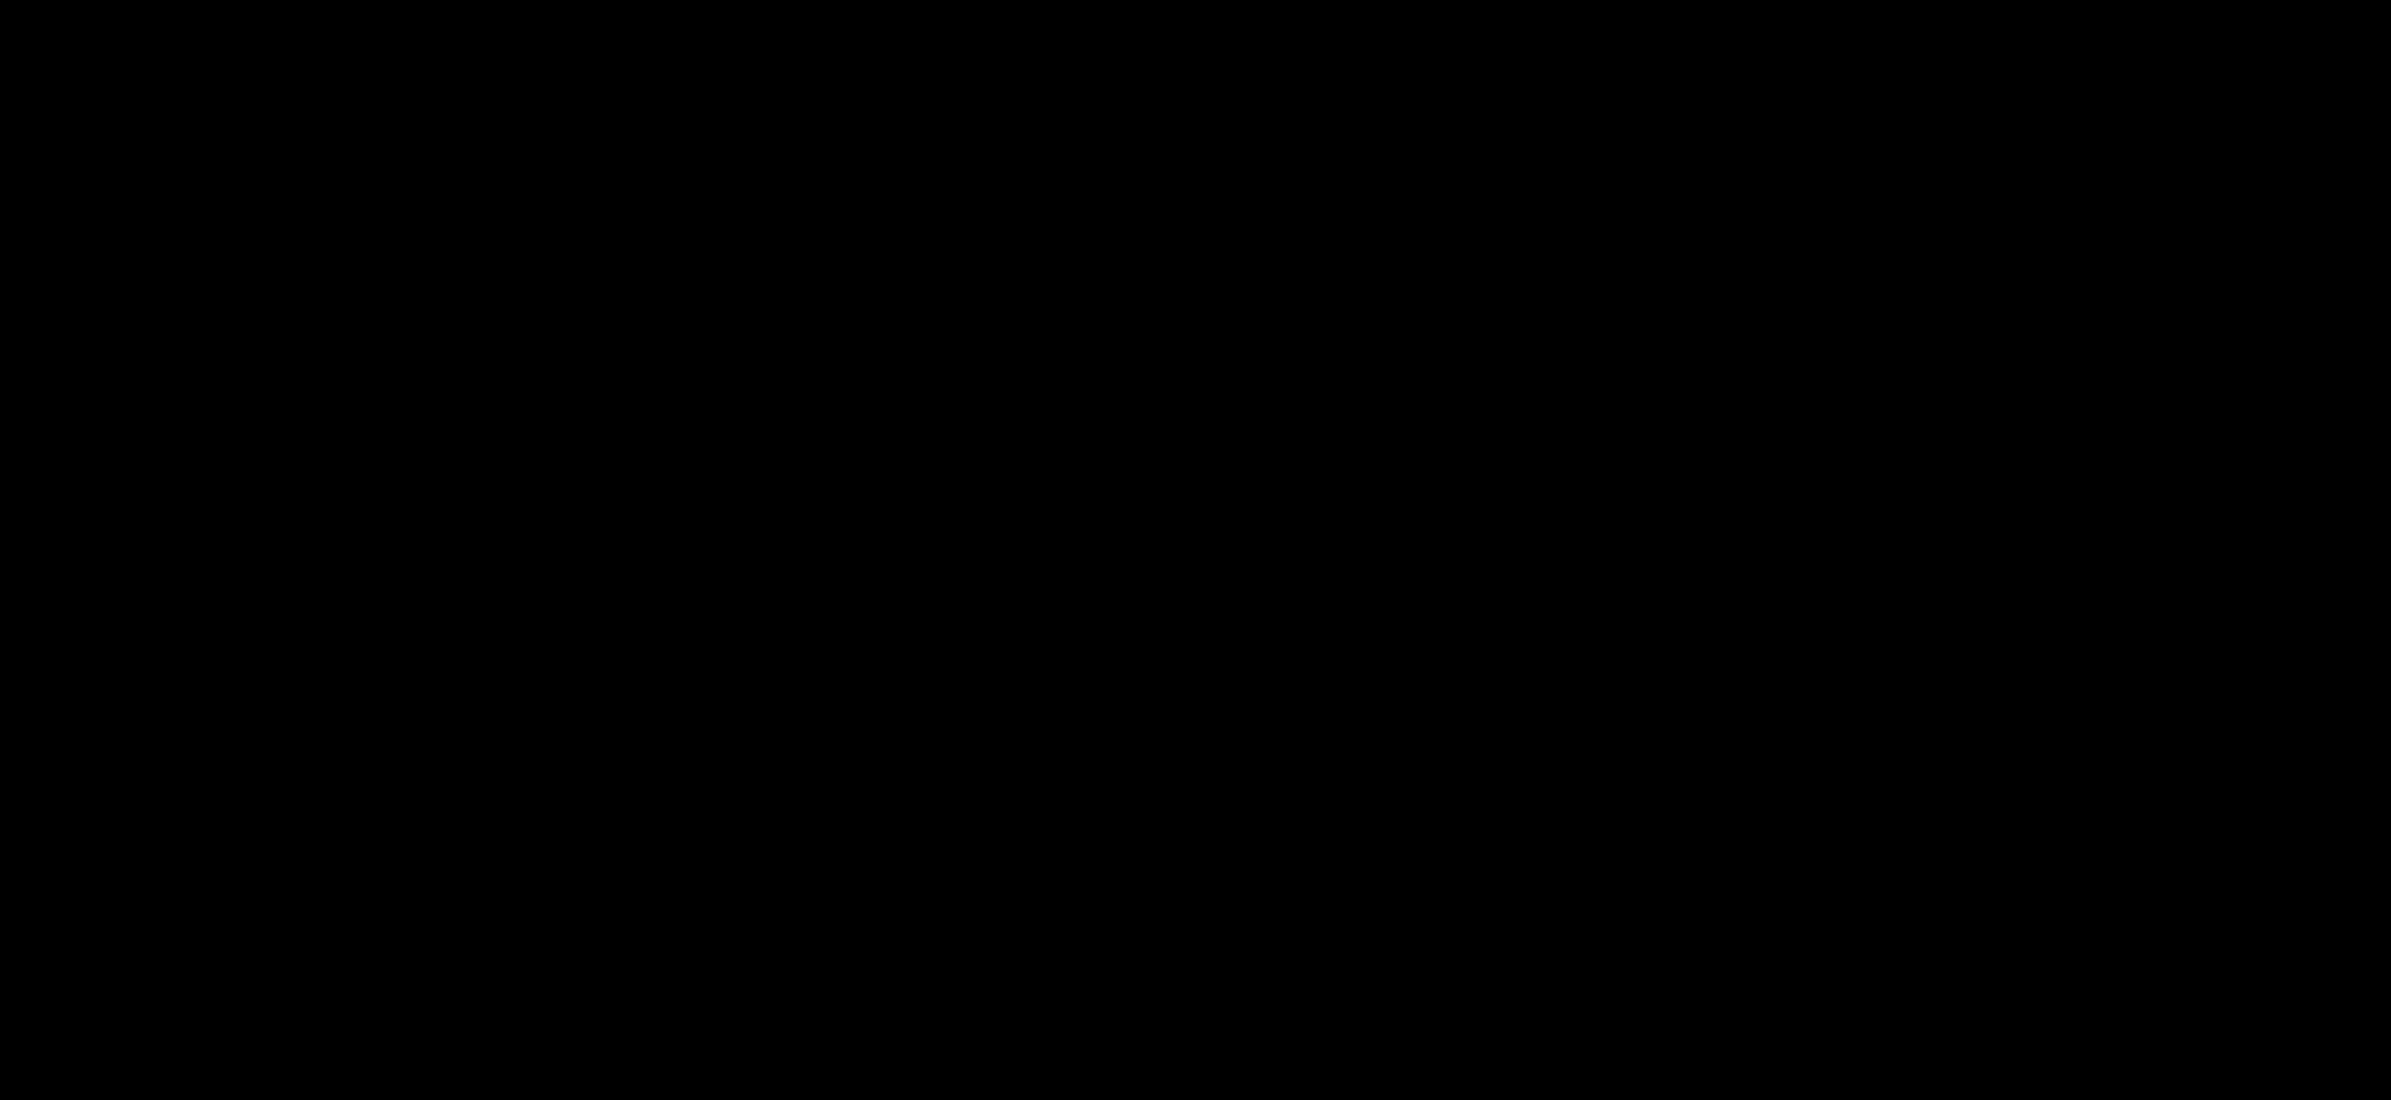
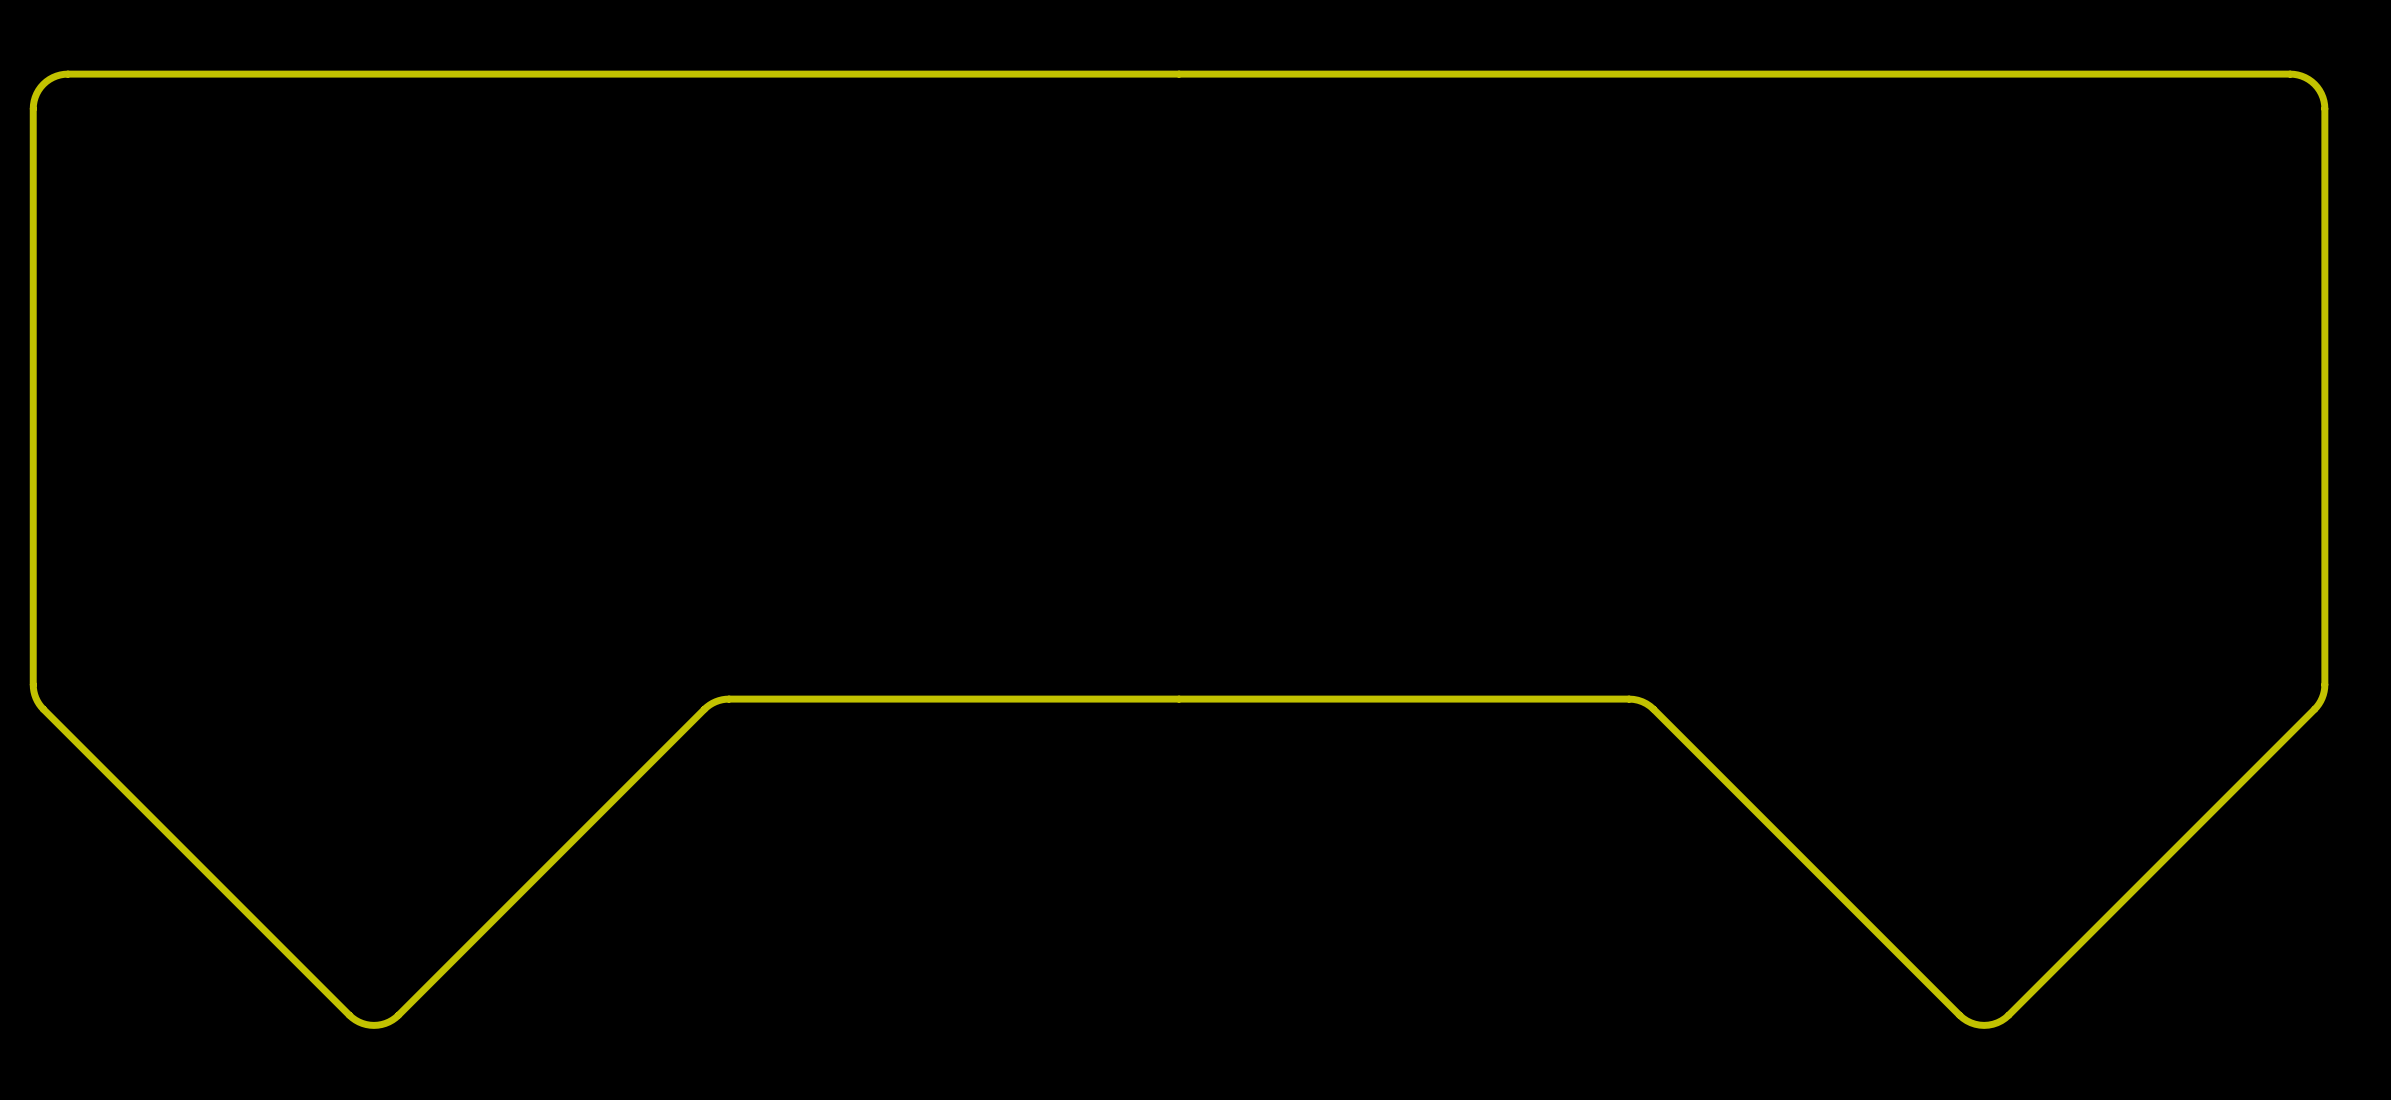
board edge: none -> (67, 74) (2297, 74) (2308, 79) (2317, 87) (2322, 97) (2324, 108) (2323, 694) (2314, 709) (2008, 1015) (1997, 1022) (1988, 1025) (1975, 1024) (1959, 1015) (1653, 709) (1642, 701) (1629, 699) (718, 700) (704, 709) (398, 1015) (381, 1024) (366, 1024) (349, 1015) (43, 709) (34, 694) (33, 108) (36, 93) (43, 84) (52, 77) (67, 74)

